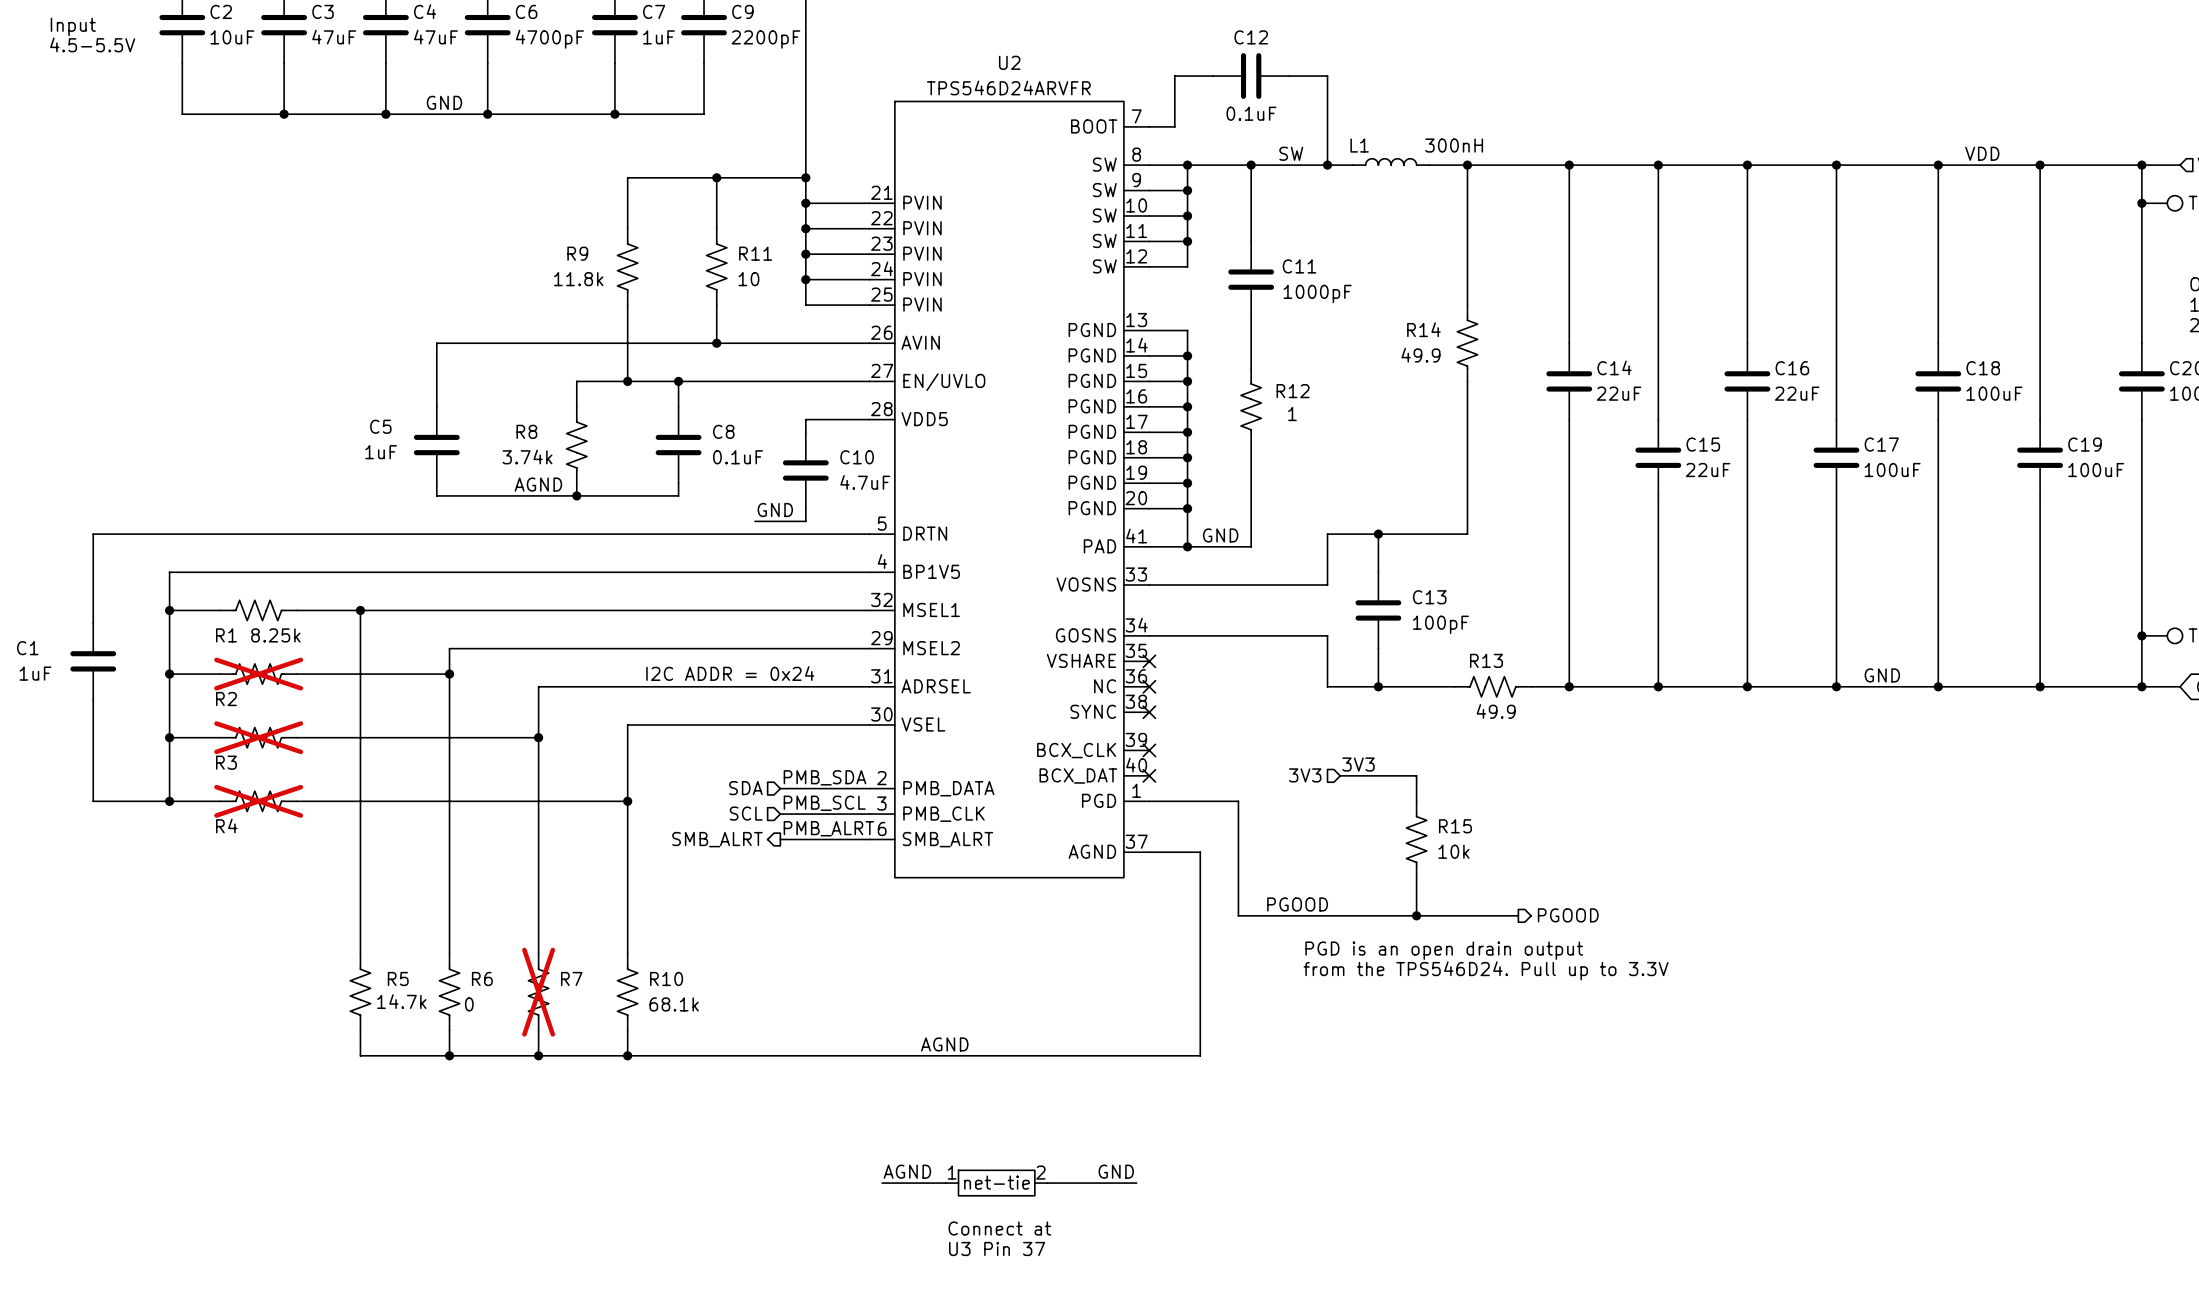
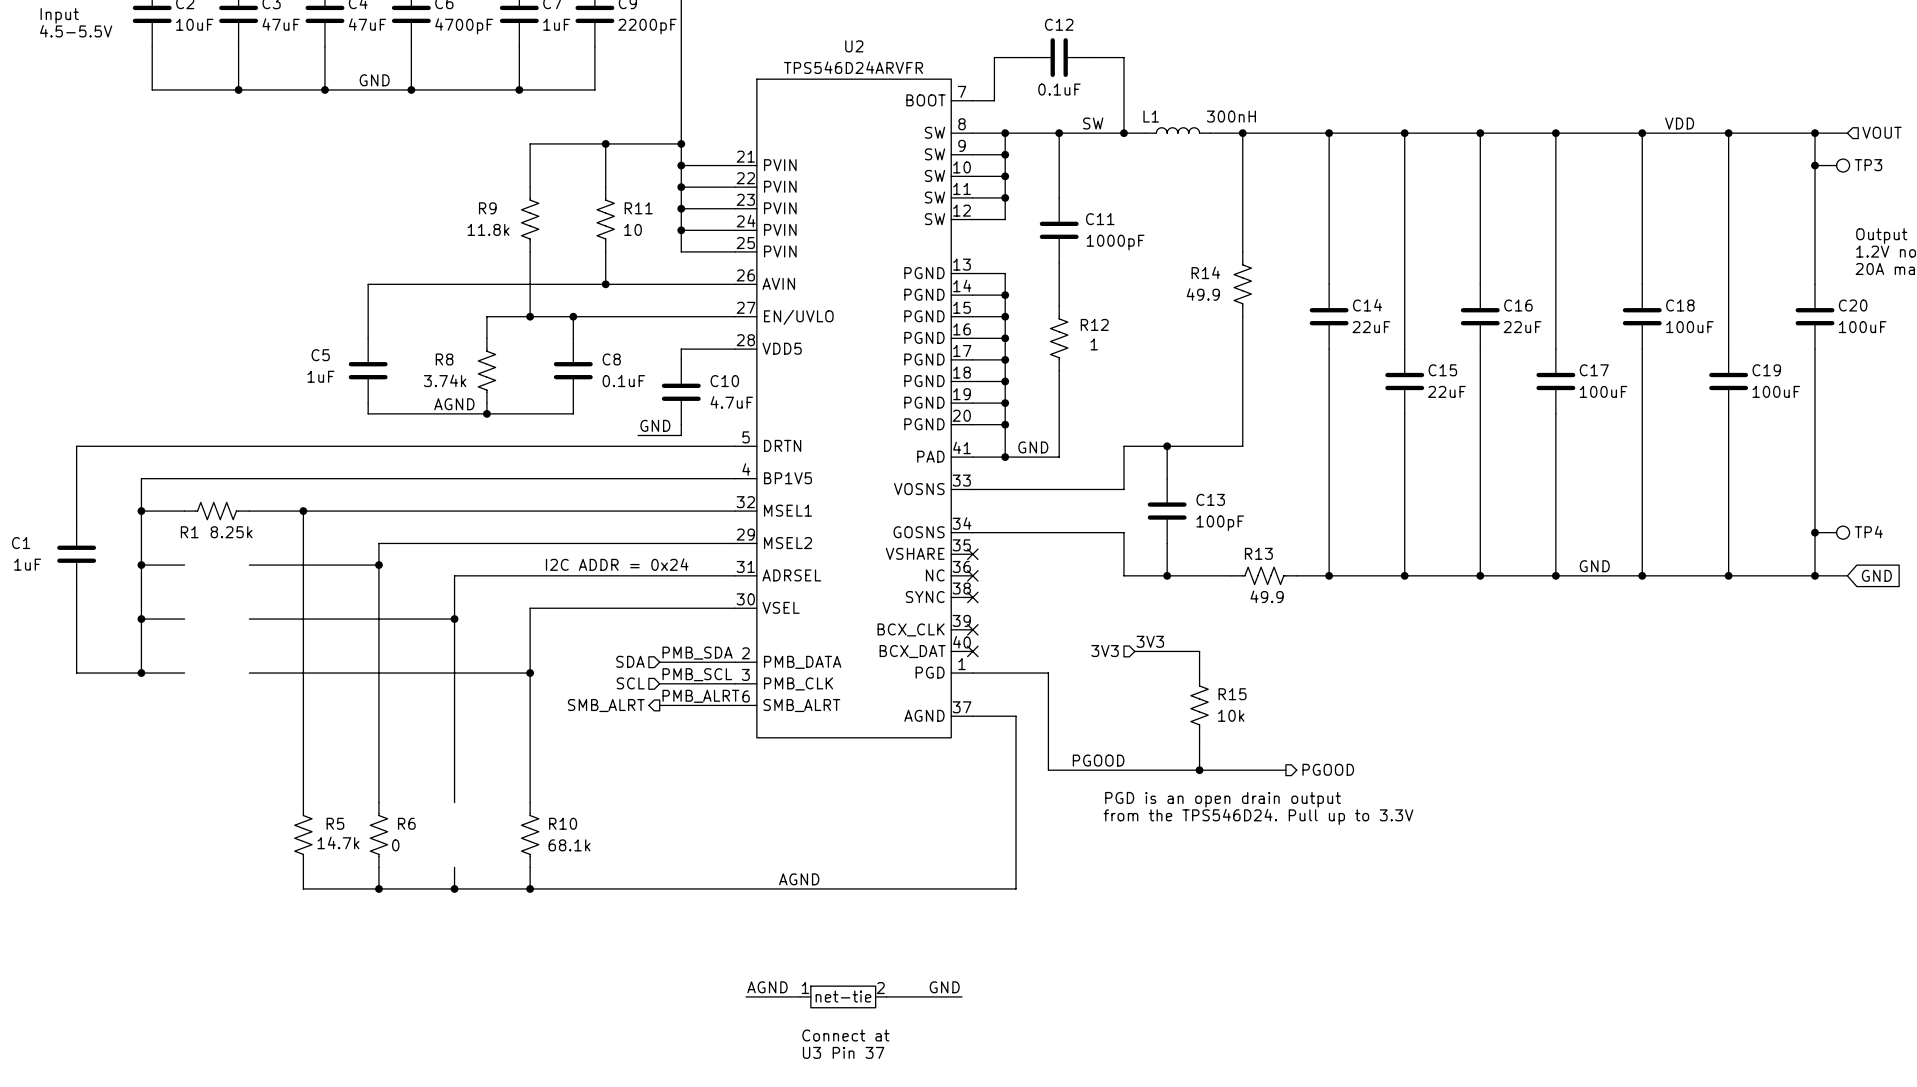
R2: (258, 674) -> none
R3: (258, 737) -> none
R4: (258, 801) -> none
R7: (538, 992) -> none

